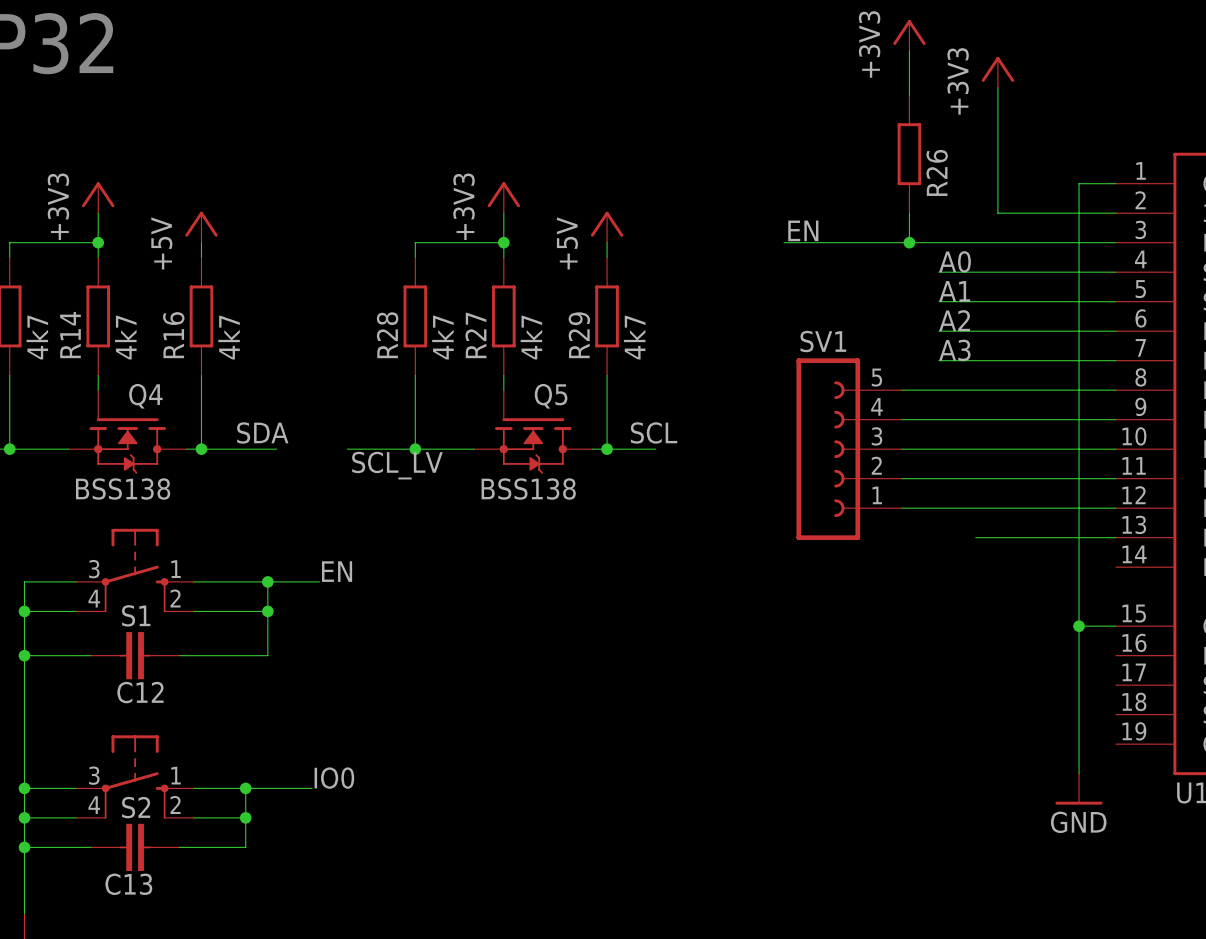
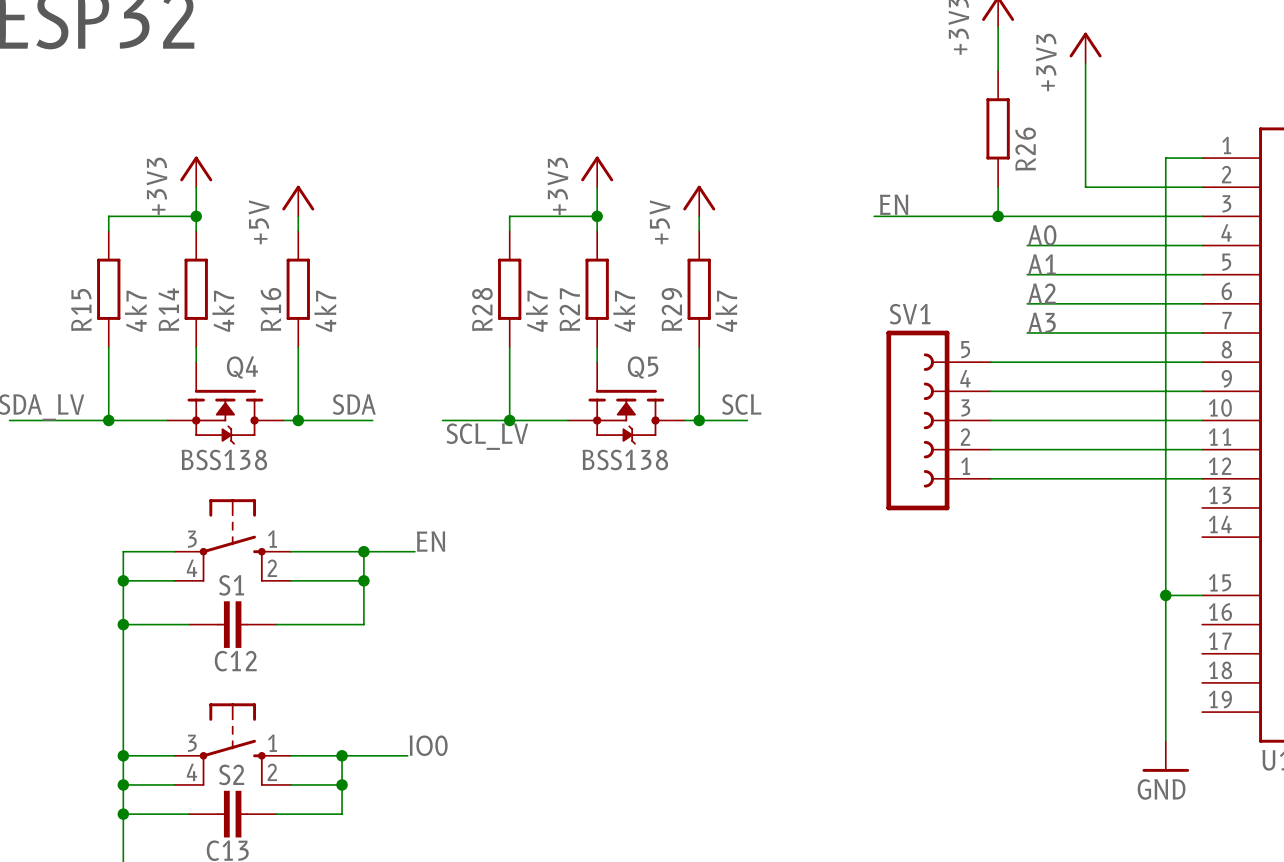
wire: (975, 537) (1115, 537) -> none

